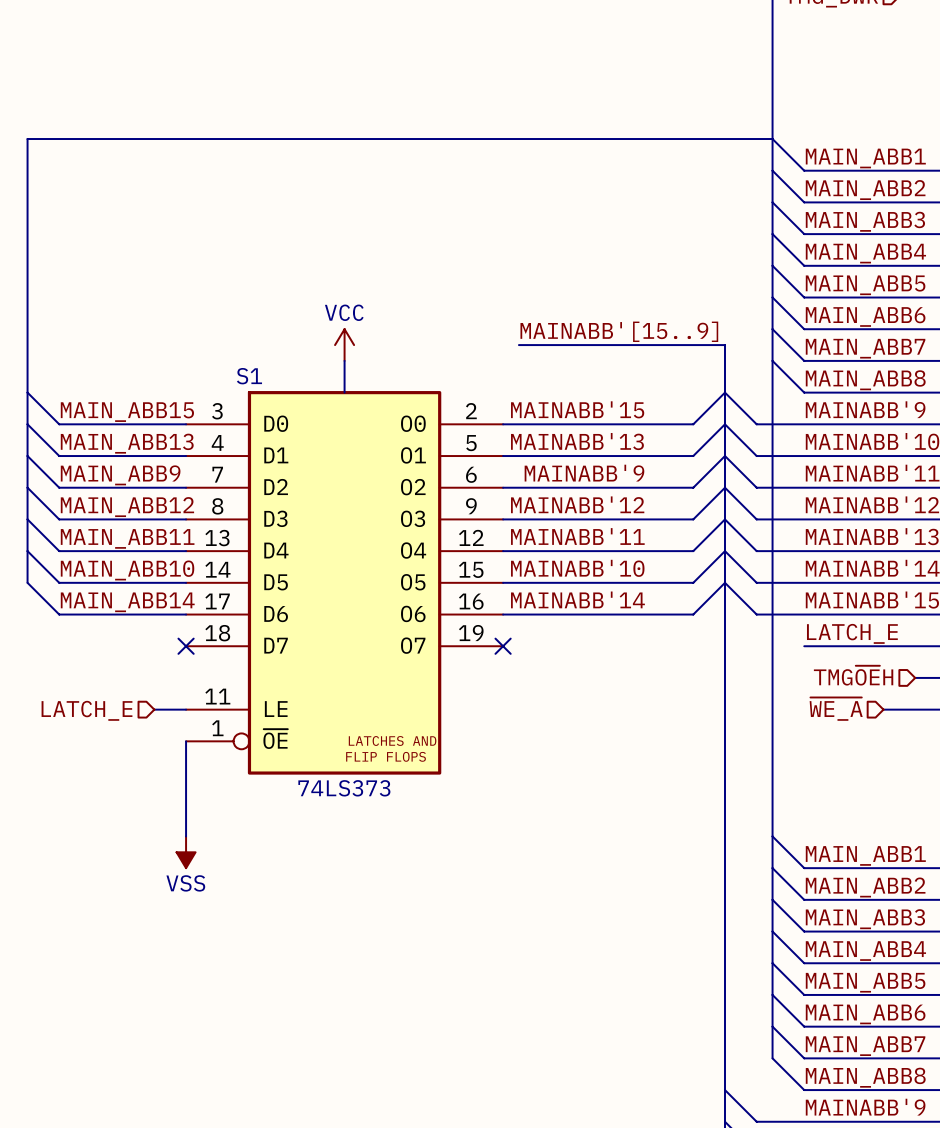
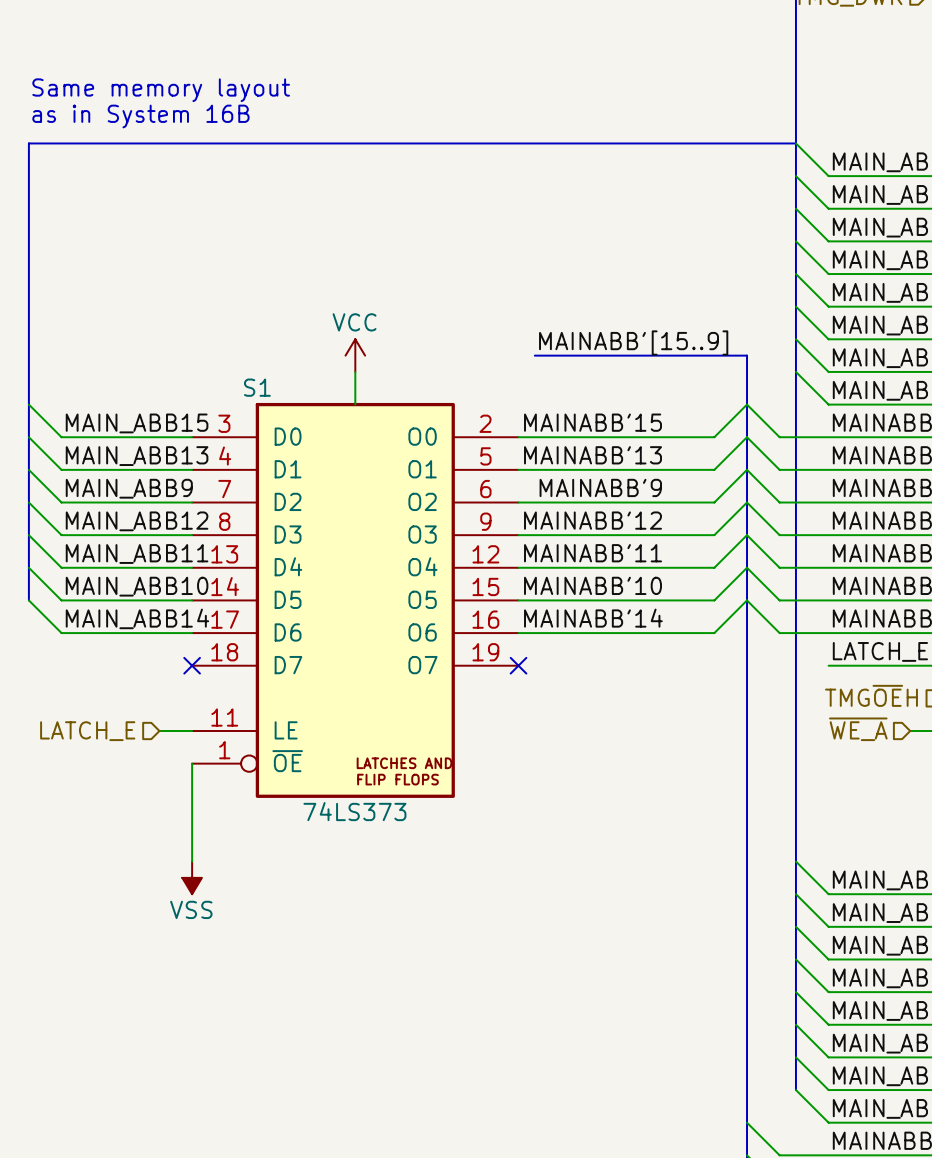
text: none -> Same memory layout (161, 90)
text: none -> as in System 16B (140, 116)

